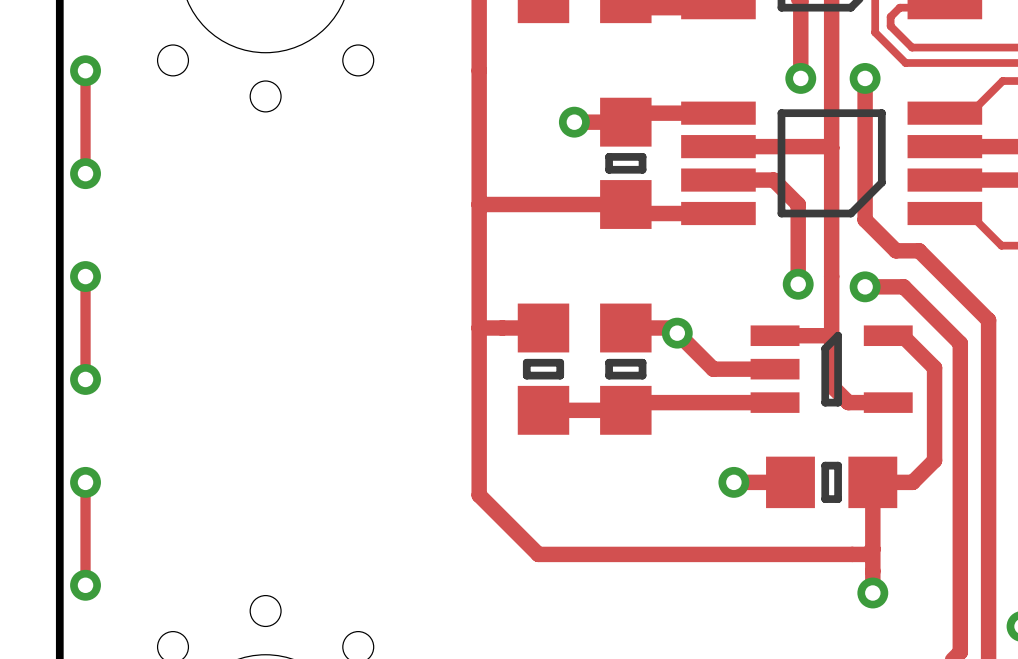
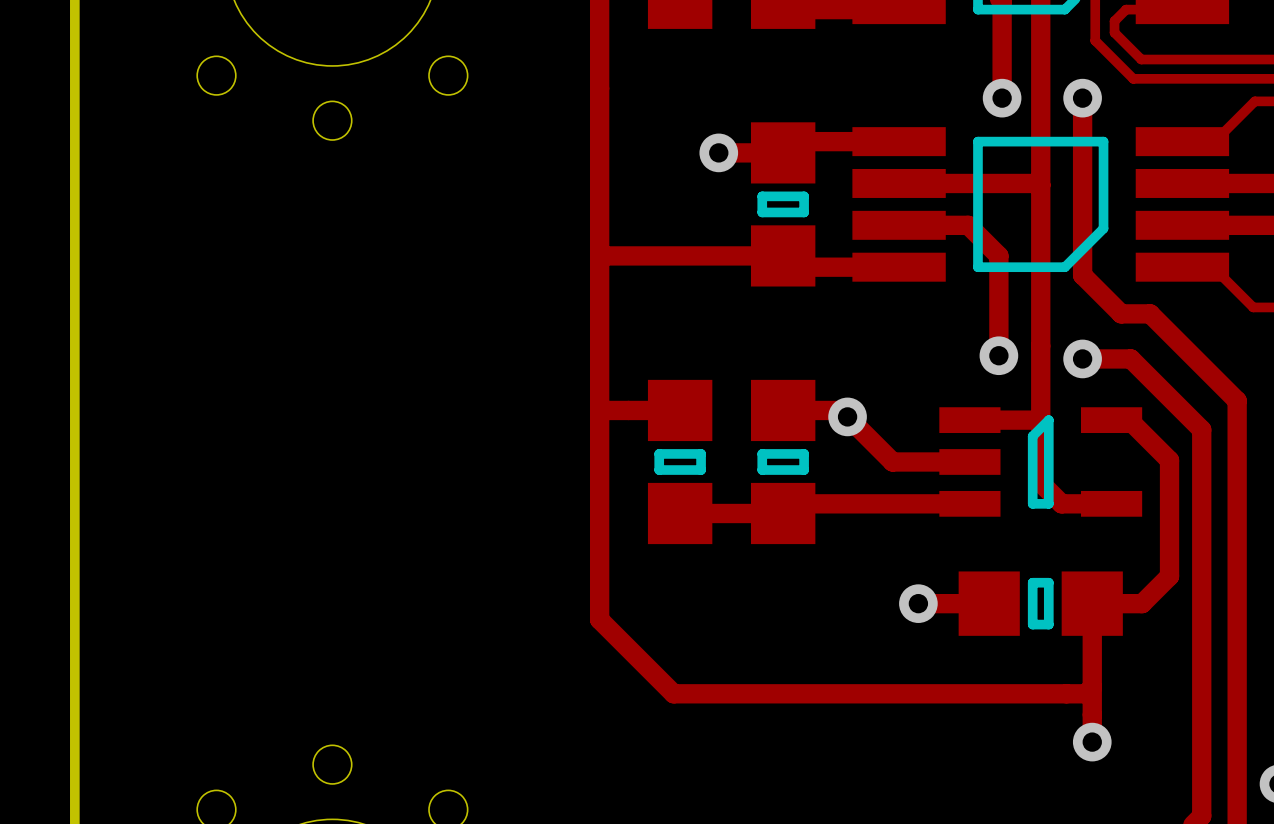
track: (85, 70) (85, 173) -> none
via: (85, 70) -> none
via: (85, 173) -> none
track: (85, 276) (85, 379) -> none
via: (85, 276) -> none
via: (85, 379) -> none
track: (85, 482) (85, 585) -> none
via: (85, 482) -> none
via: (85, 585) -> none

